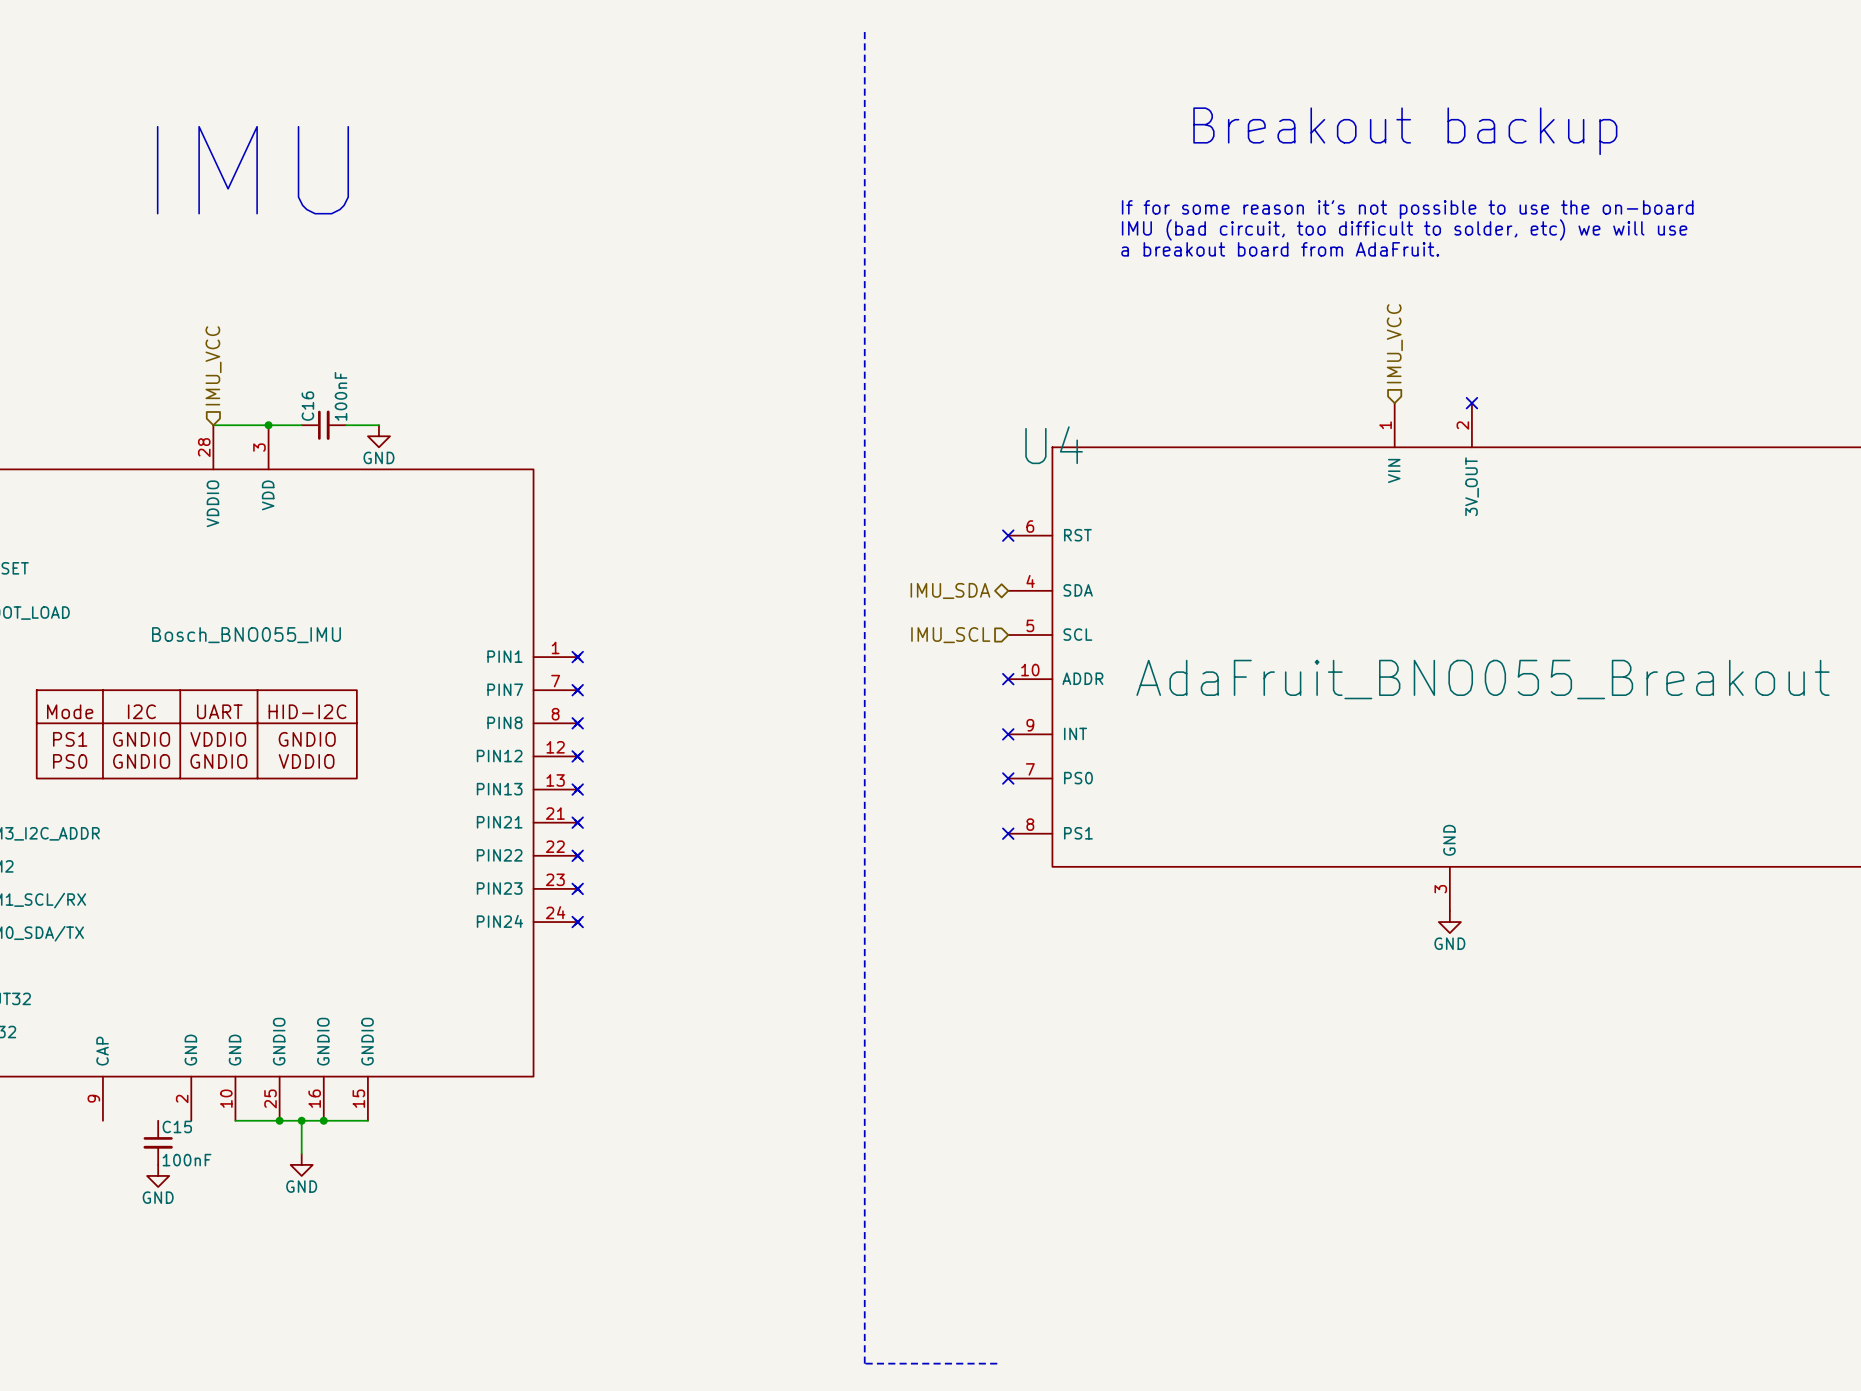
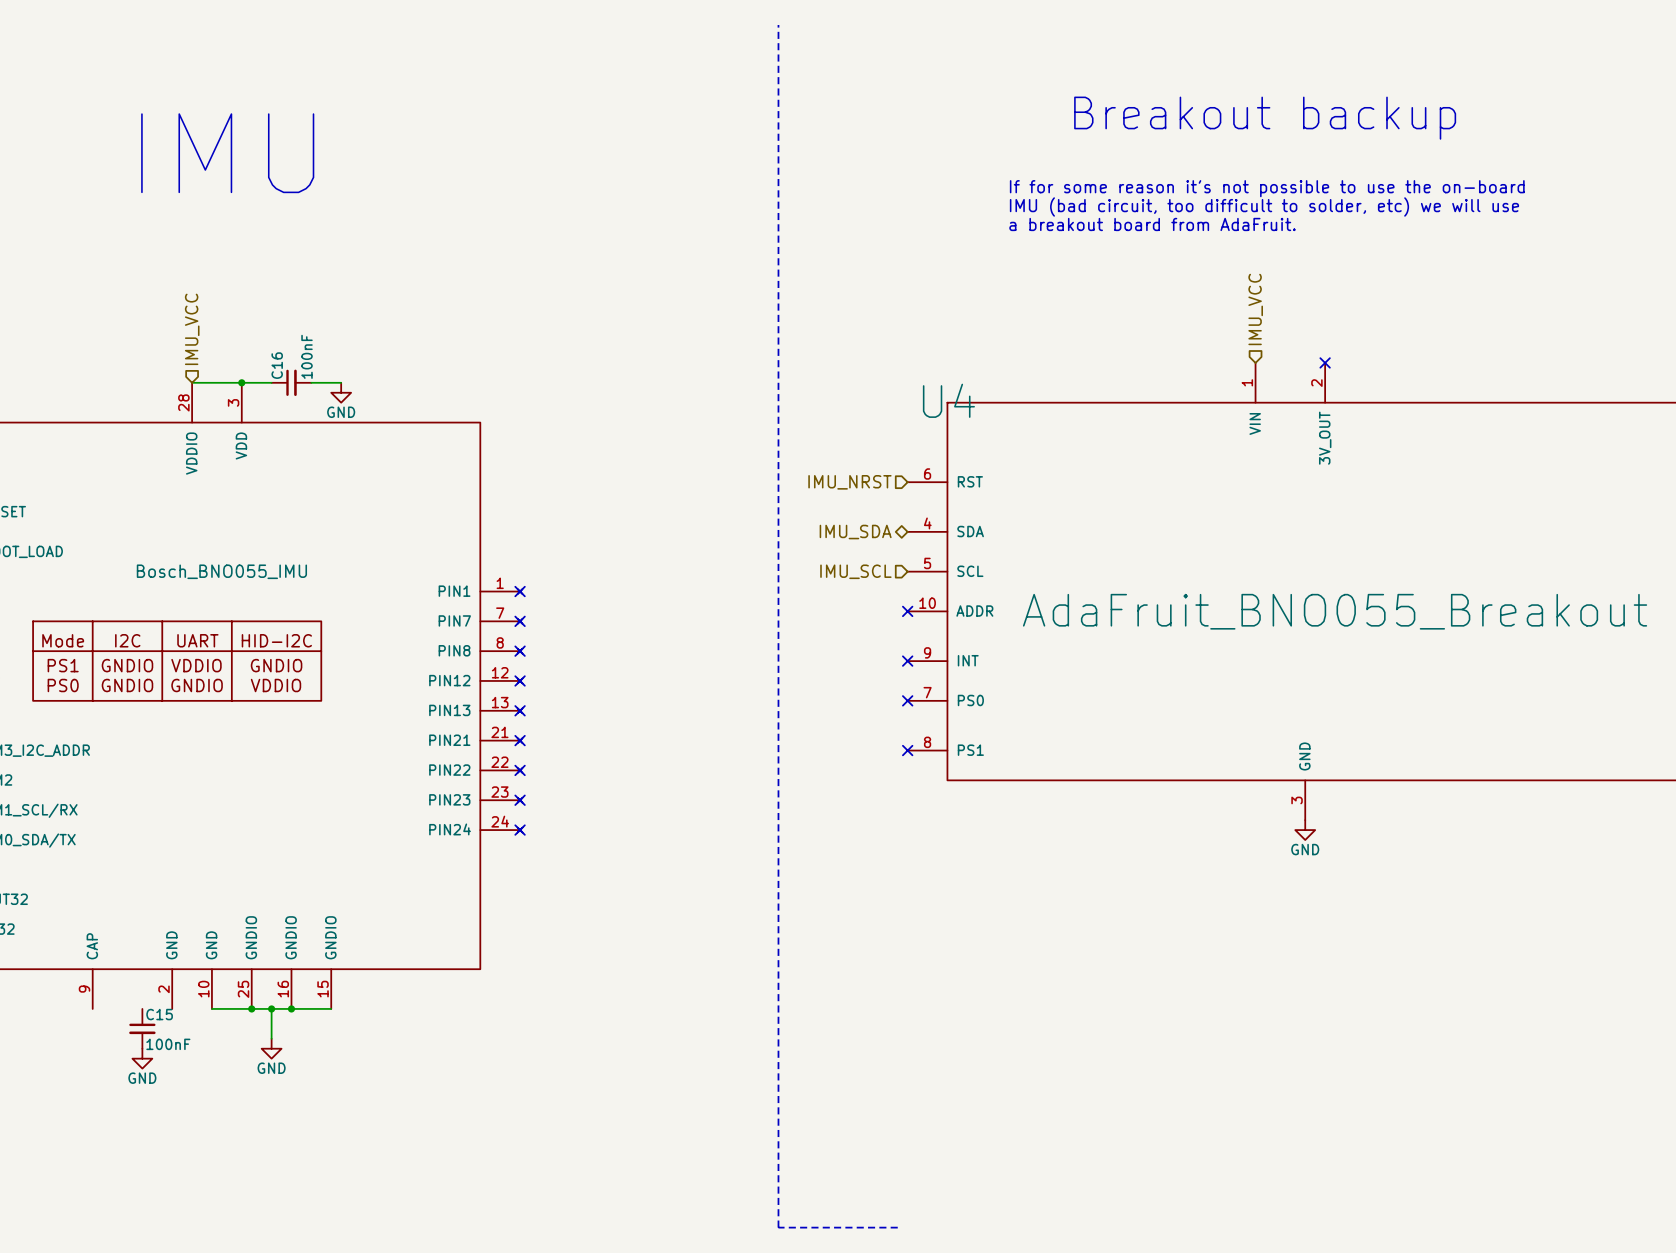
hierarchical label: none -> IMU_NRST (849, 482)
no-connect mark: (1008, 535) -> none

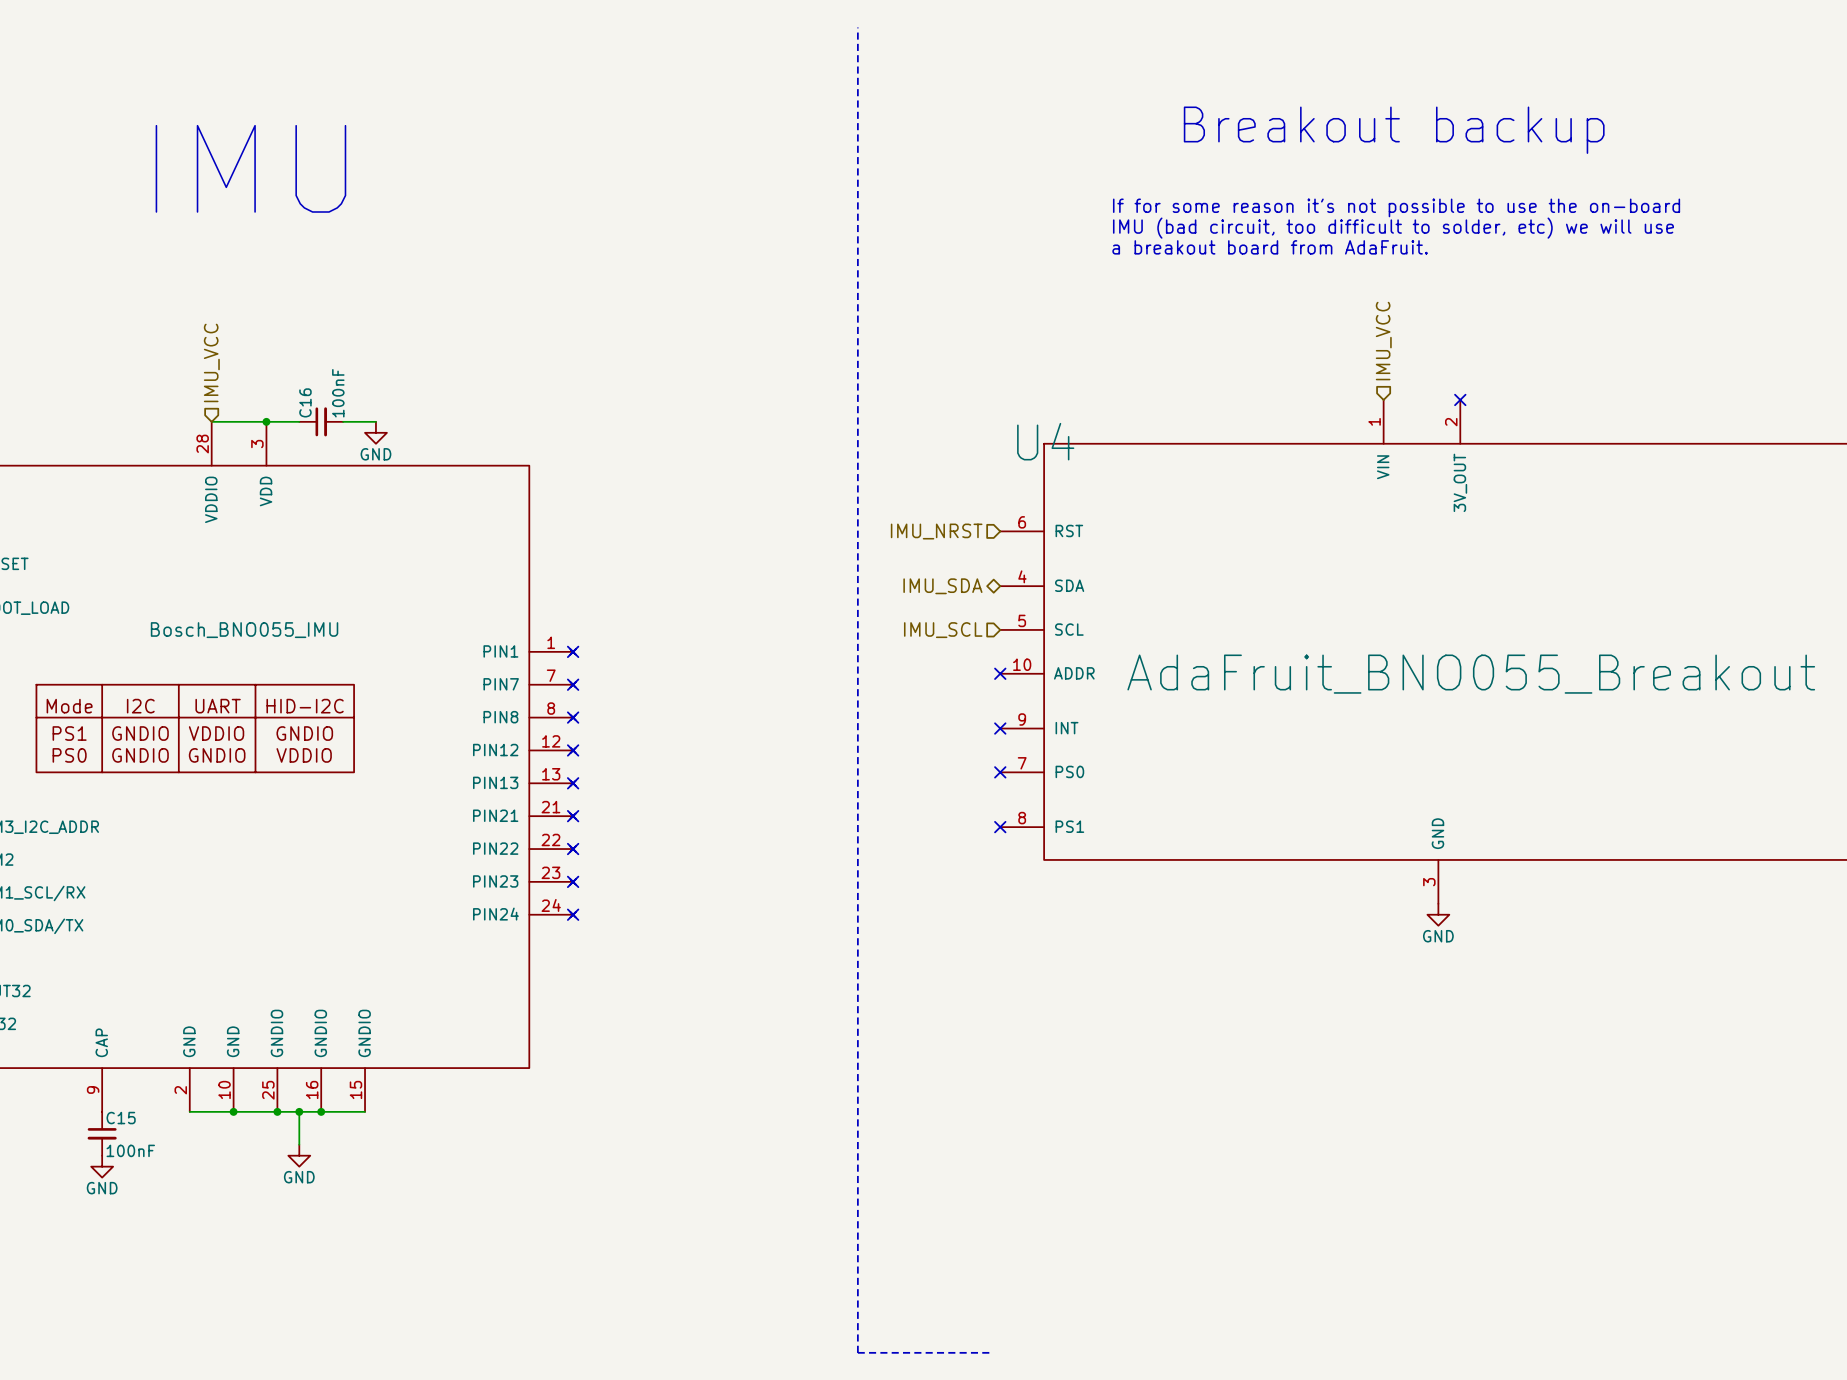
wire: none -> (189, 1111) (233, 1111)
junction: none -> (233, 1111)
C15 position: (142, 1028) -> (102, 1133)
power symbol position: GND (142, 1058) -> GND (102, 1166)

